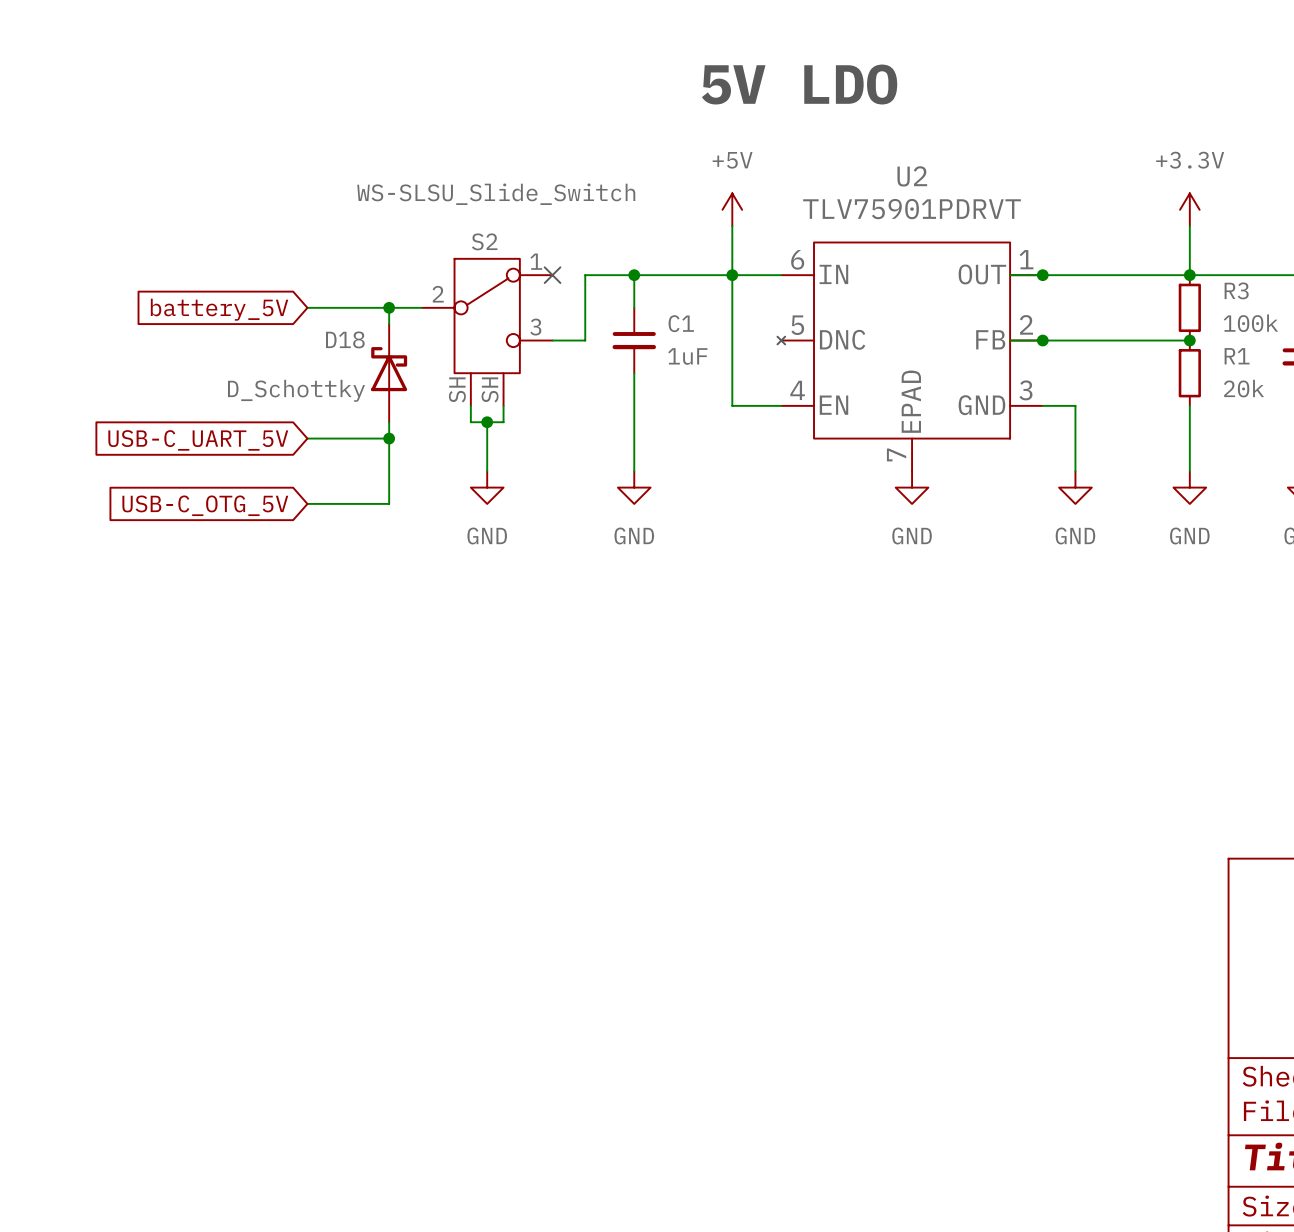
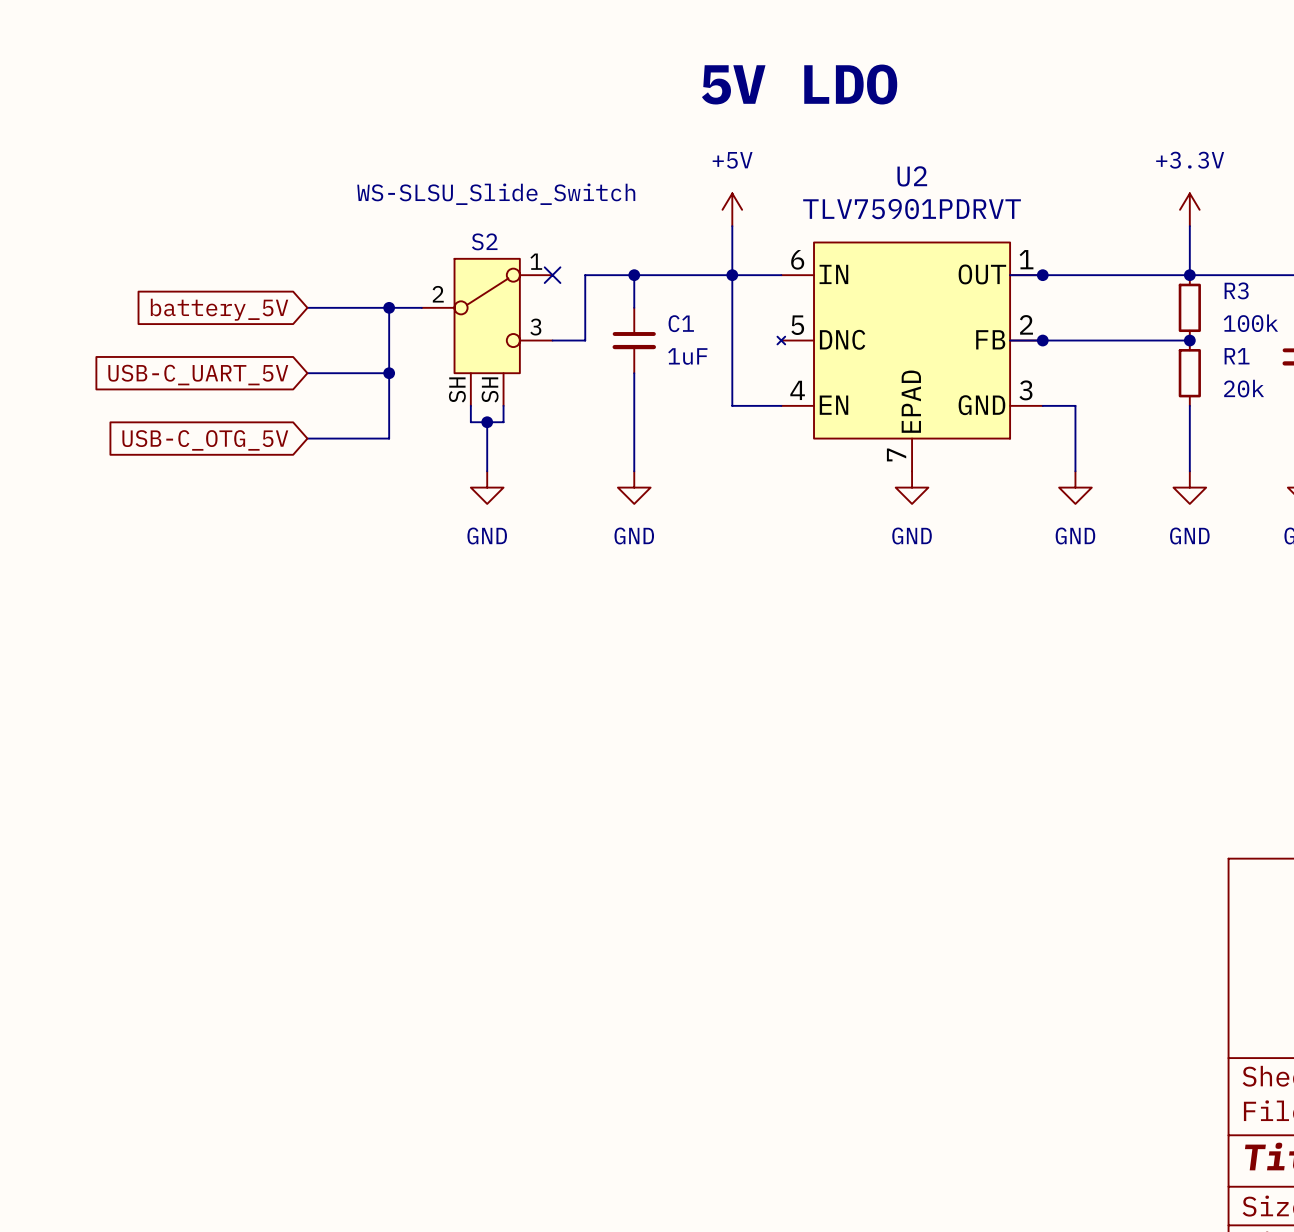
wire: none -> (307, 373) (389, 373)
D18: D_Schottky (389, 373) -> none
global label: none -> USB-C_UART_5V (198, 375)
wire: (389, 438) (389, 503) (307, 503) -> none
junction position: (389, 438) -> (389, 373)
global label: USB-C_UART_5V (198, 440) -> USB-C_OTG_5V (205, 440)
global label: USB-C_OTG_5V (205, 505) -> none

